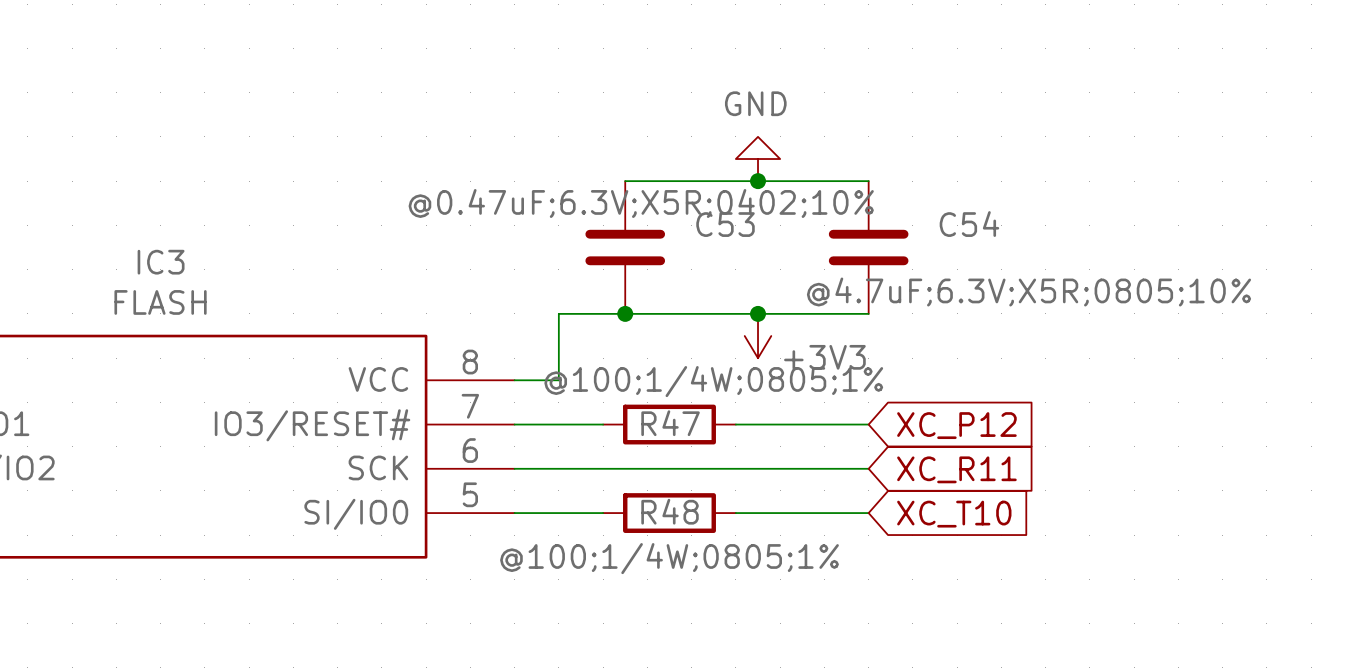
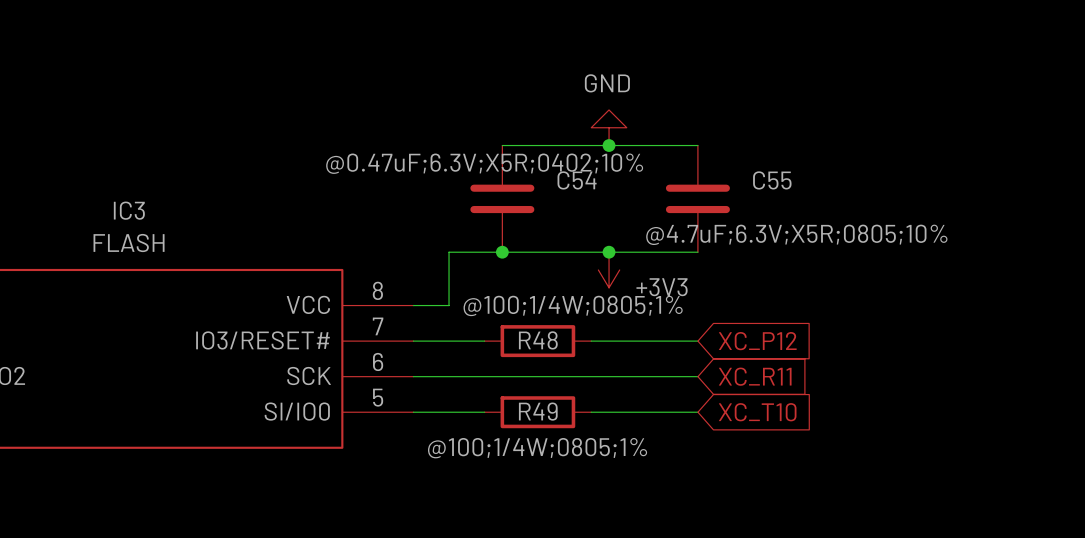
C53 name: C53 (725, 224) -> C54 (577, 180)
C54 name: C54 (969, 224) -> C55 (772, 180)
R47 name: R47 (670, 423) -> R48 (538, 340)
R48 name: R48 (670, 511) -> R49 (538, 411)

